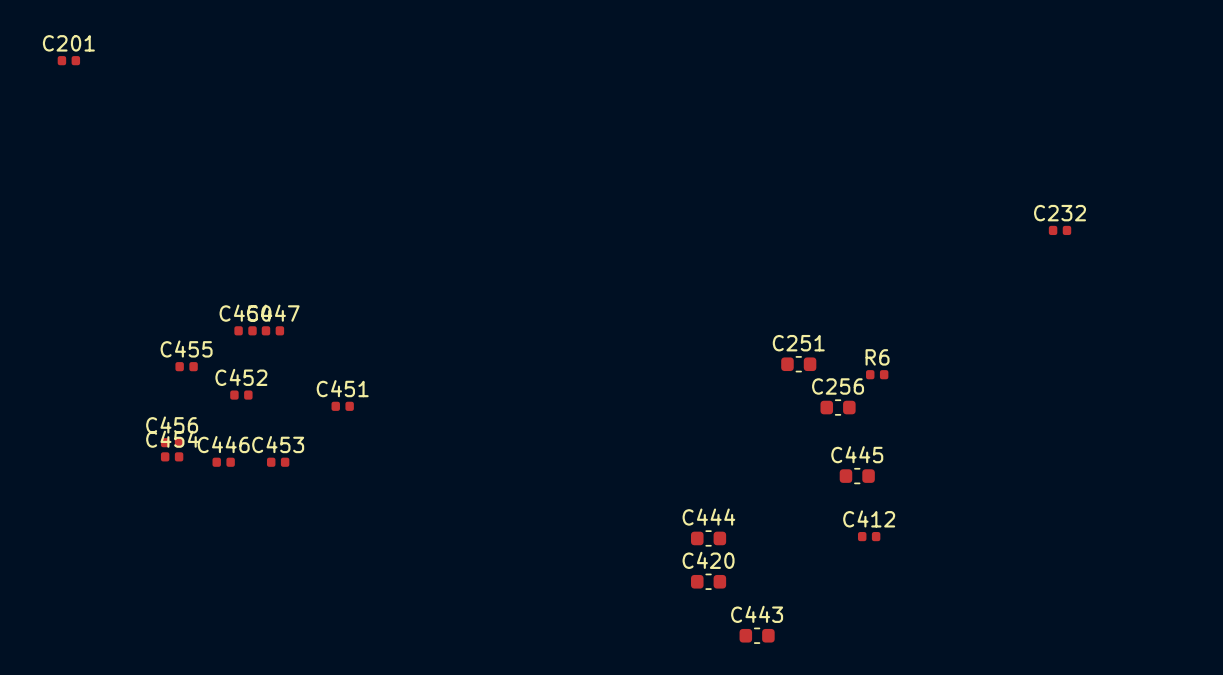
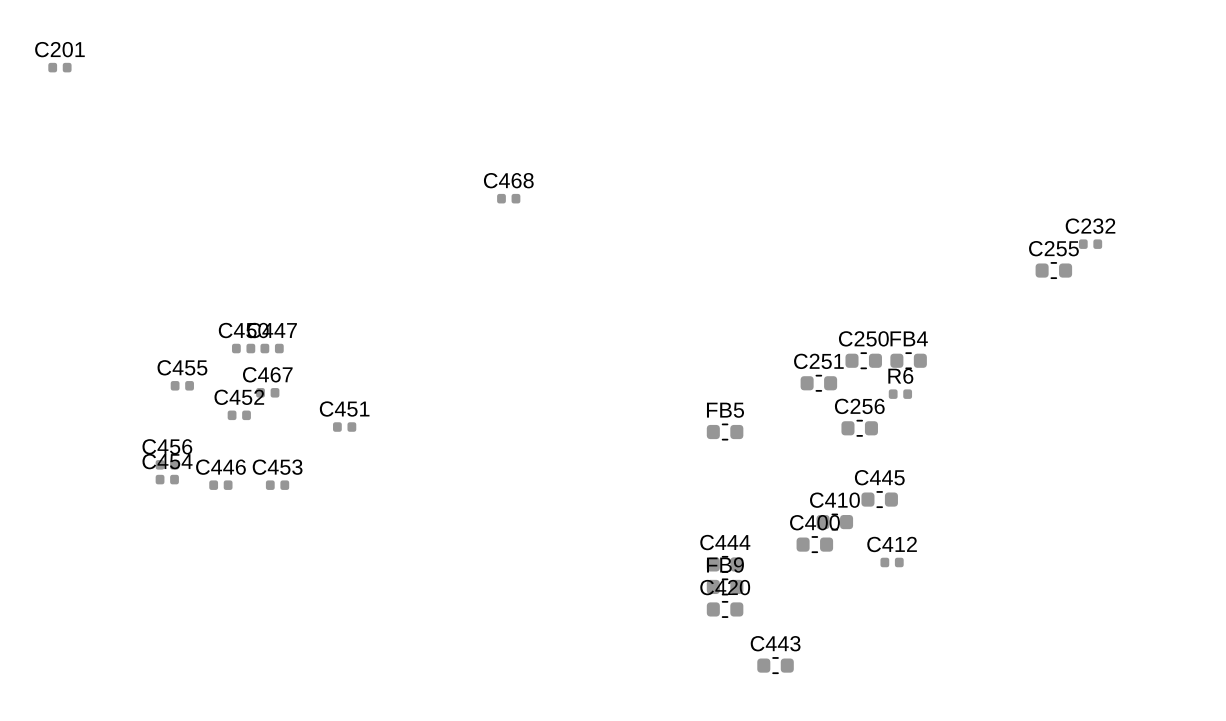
C468: none -> (508, 198)
C255: none -> (1053, 270)
C250: none -> (863, 360)
FB4: none -> (908, 360)
C467: none -> (267, 392)
FB5: none -> (725, 432)
C410: none -> (834, 522)
C400: none -> (814, 544)
FB9: none -> (725, 586)

